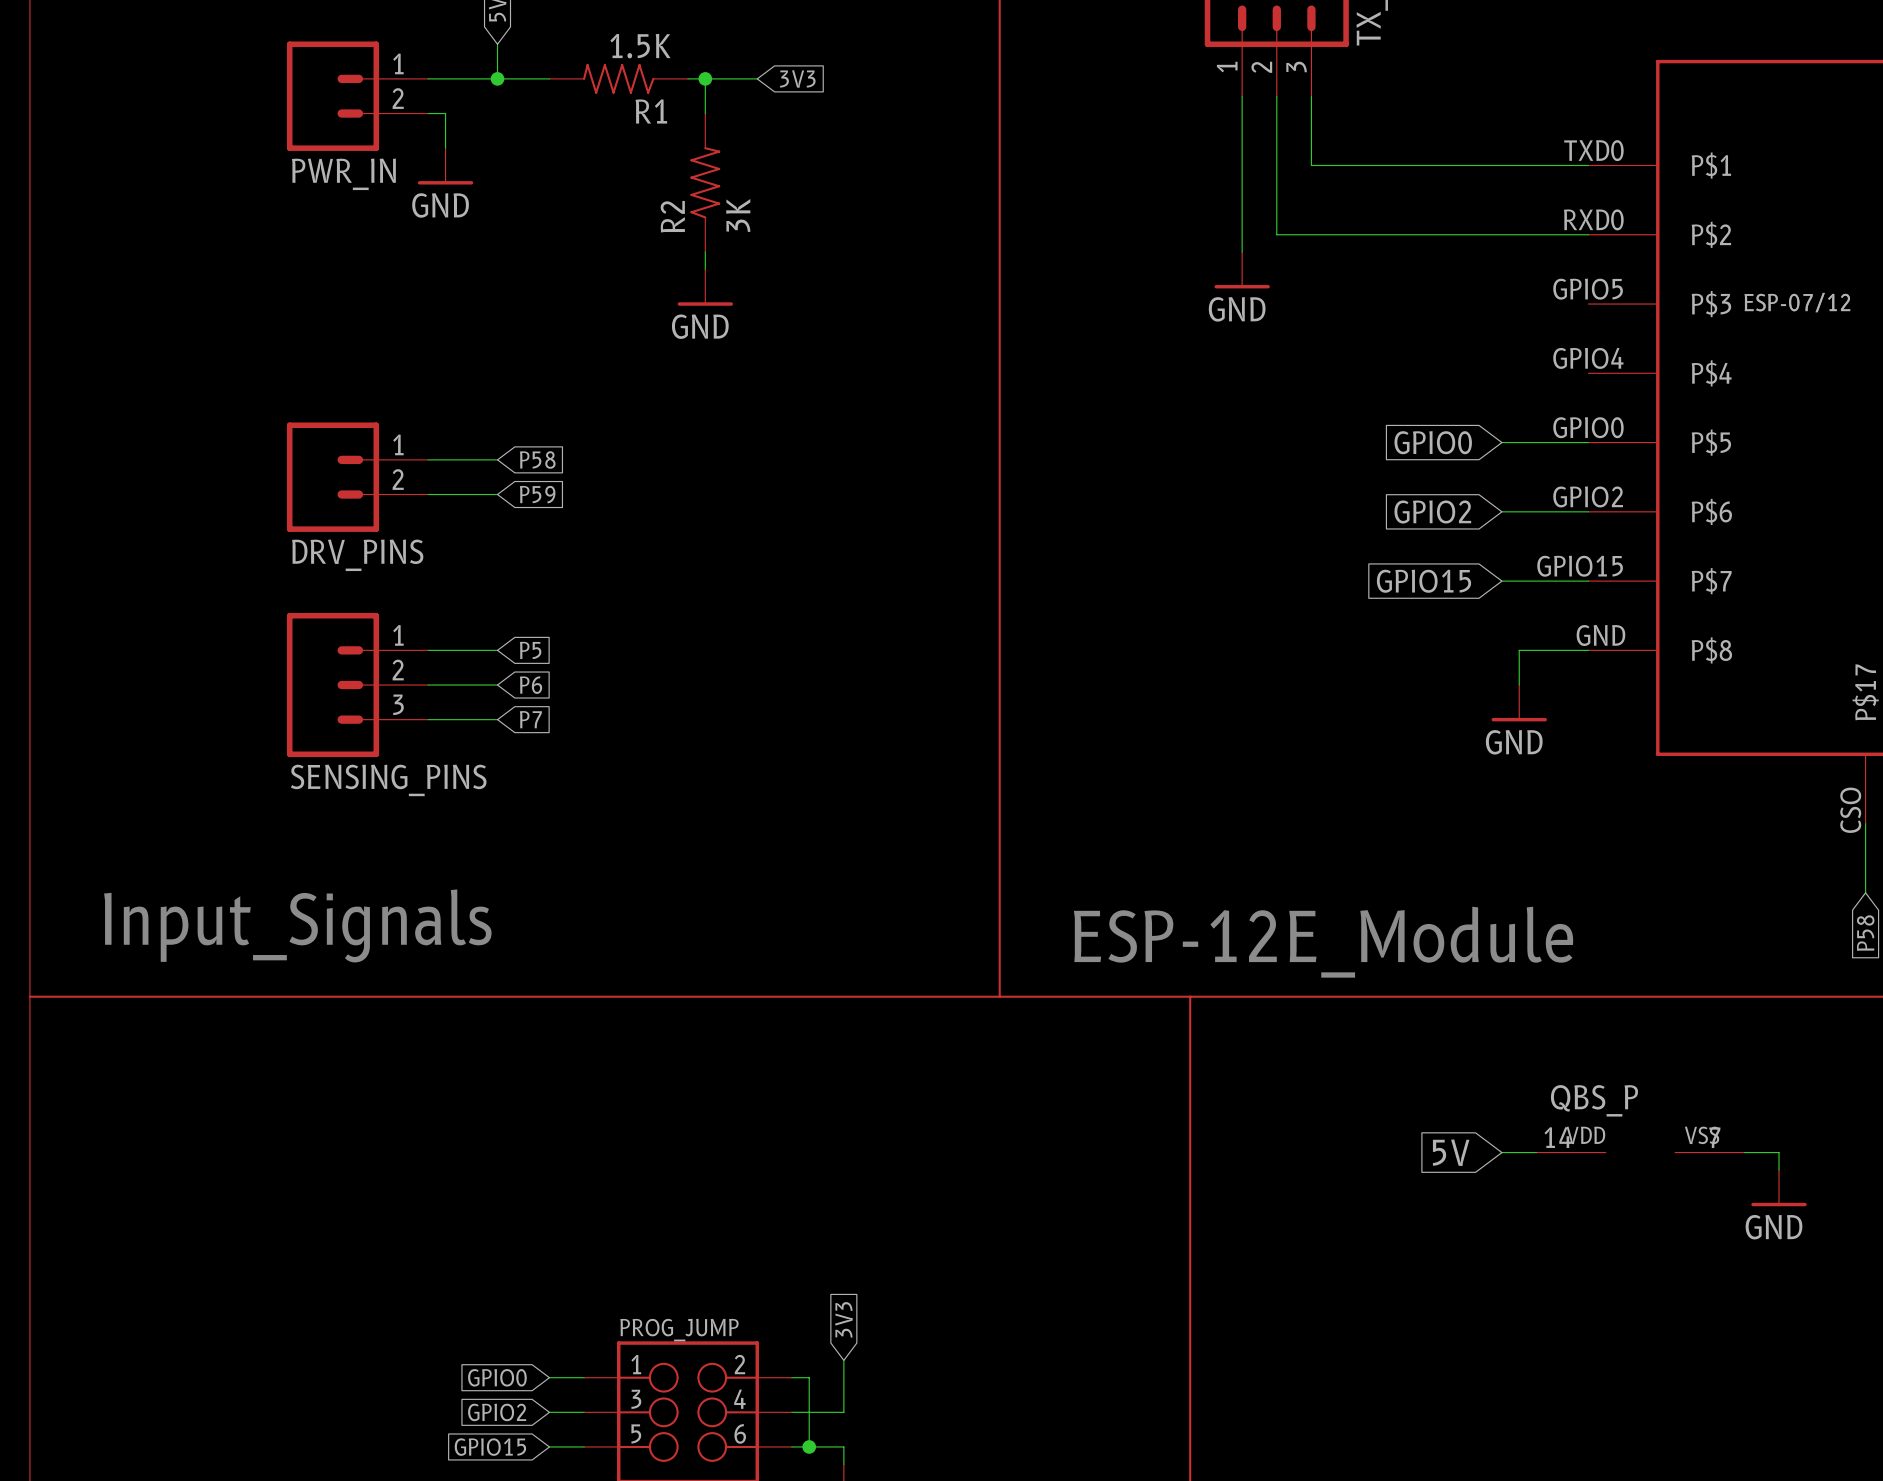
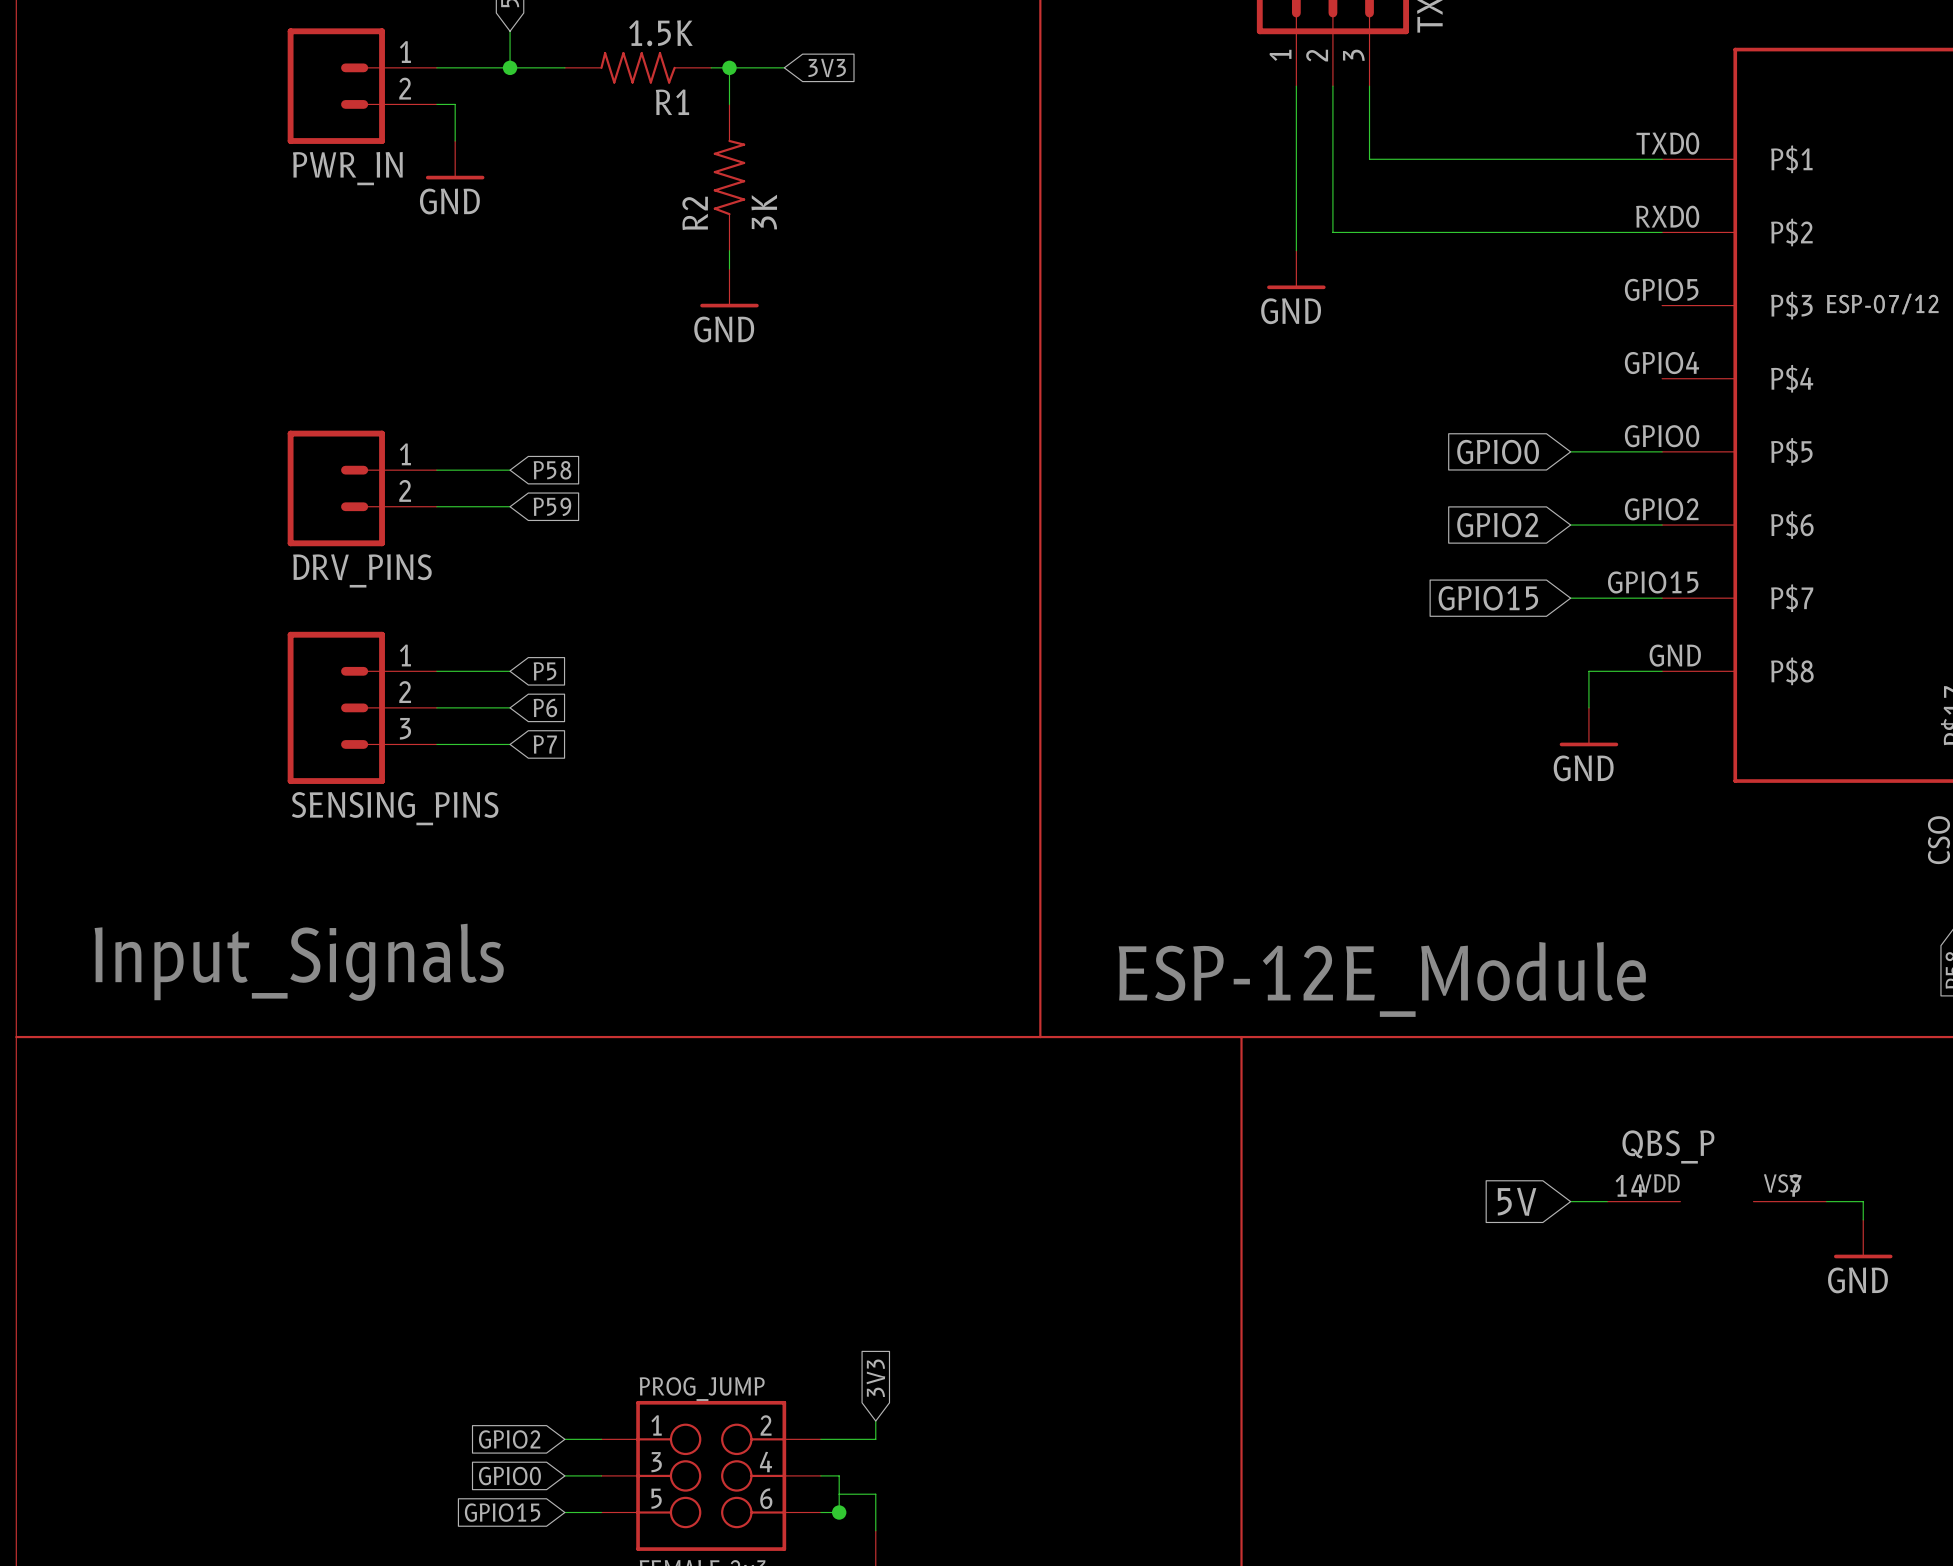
global label: GPIO0 (497, 1377) -> GPIO2 (509, 1439)
wire: (809, 1377) (809, 1412) (843, 1412) (843, 1377) -> (839, 1439) (875, 1439)
global label: GPIO2 (497, 1412) -> GPIO0 (509, 1476)
wire: (809, 1446) (843, 1446) -> (839, 1494) (875, 1494) (875, 1512)

